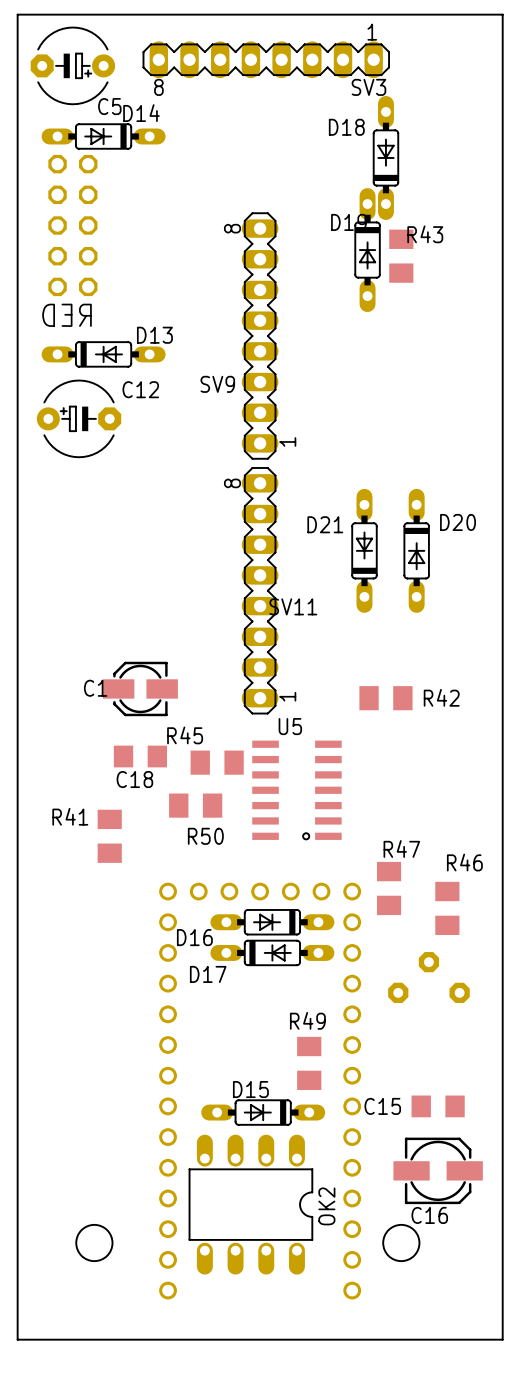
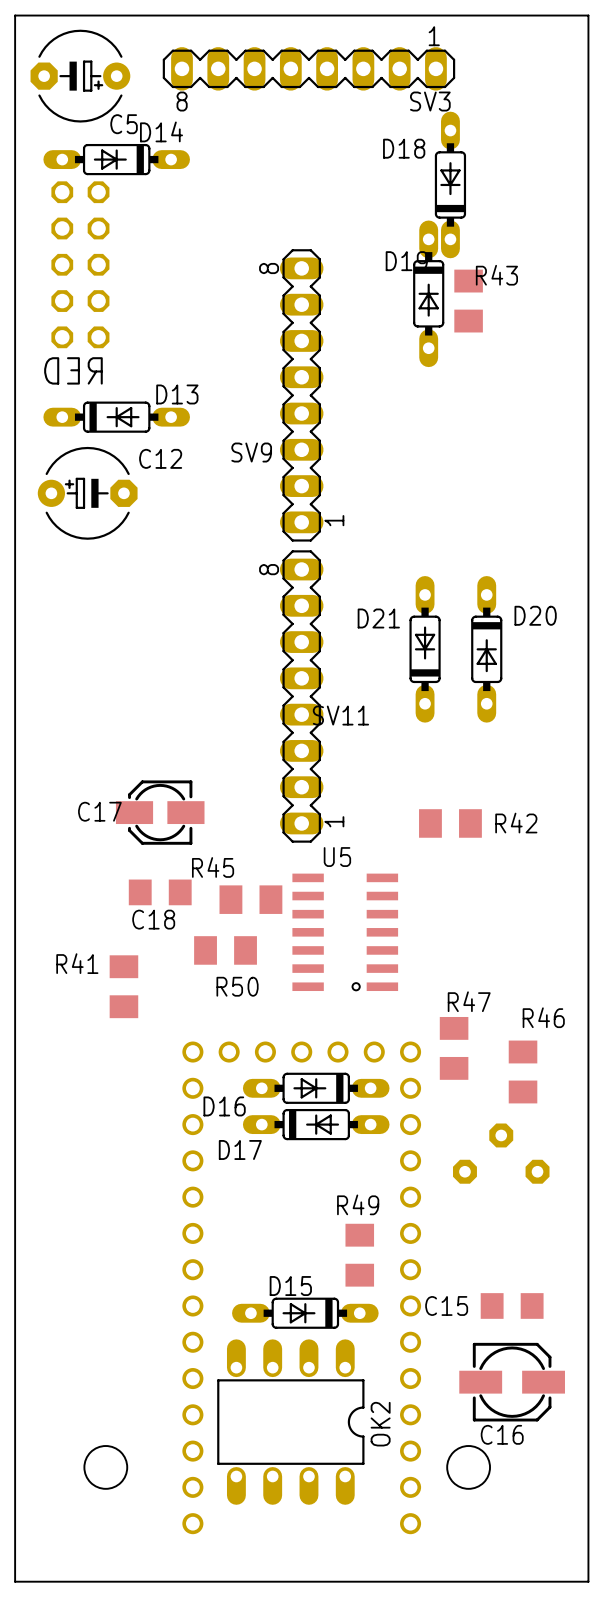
C1 name: C1 (95, 688) -> C17 (99, 811)

